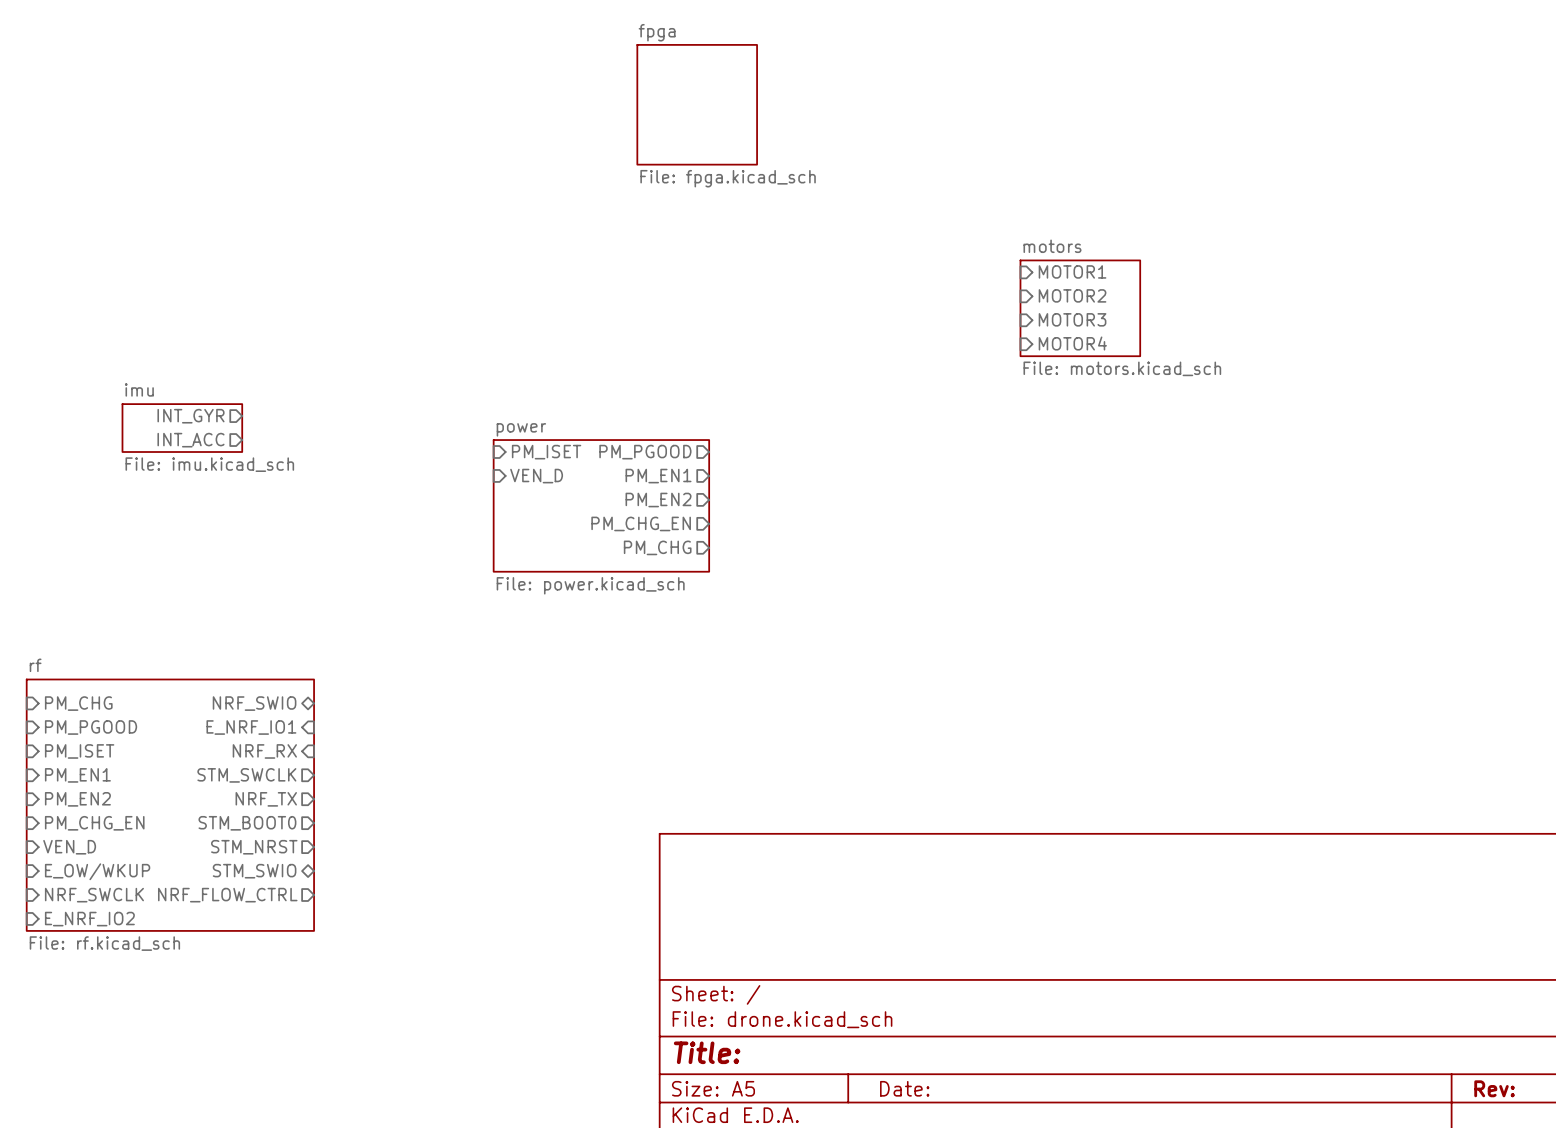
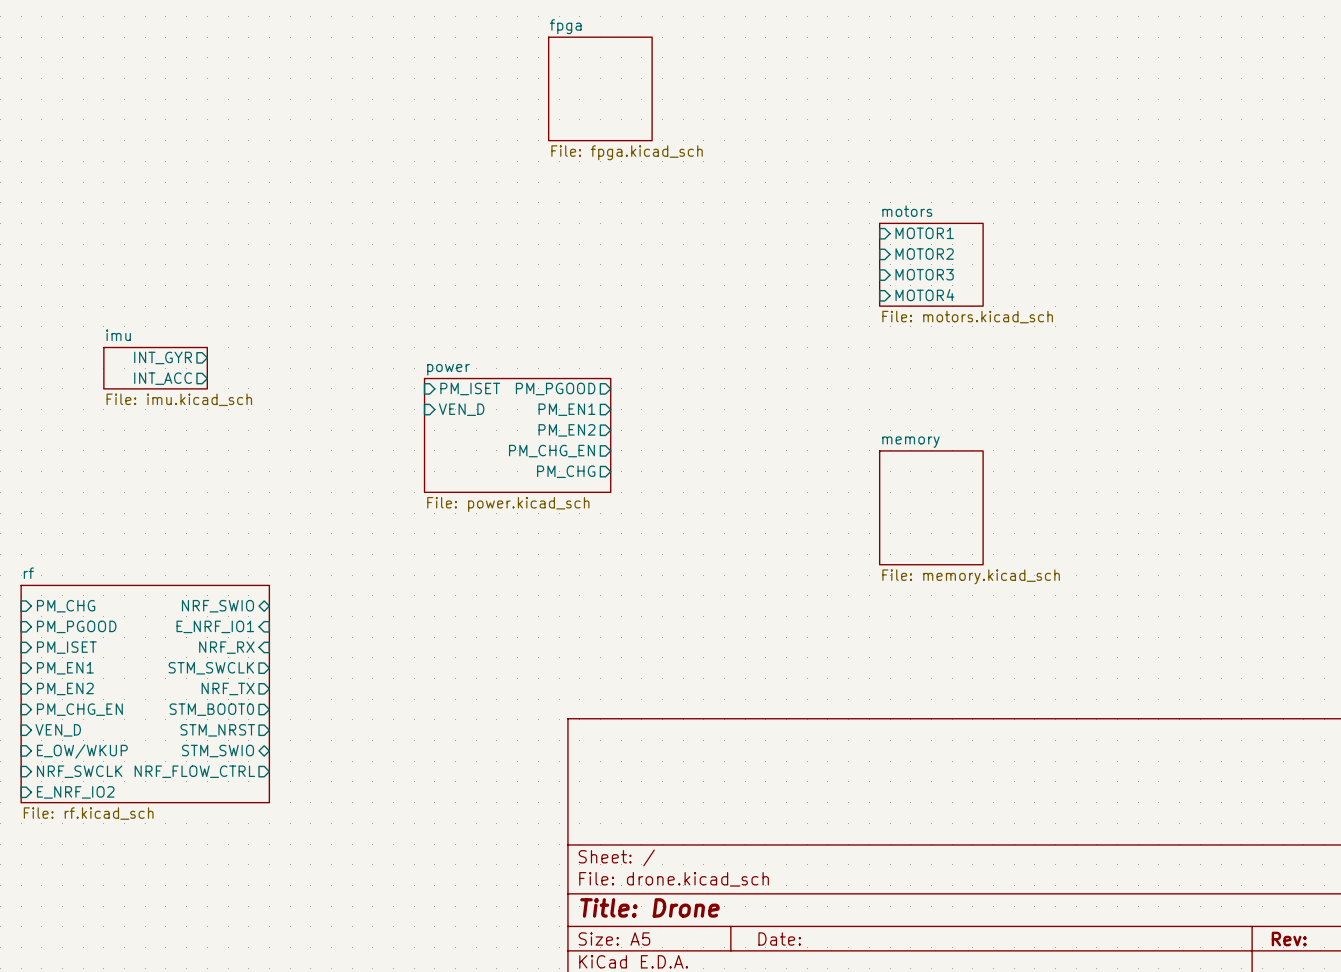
sheet memory: none -> File: memory.kicad_sch (931, 507)
title block: Title: (707, 1052) -> Title: Drone (650, 907)

